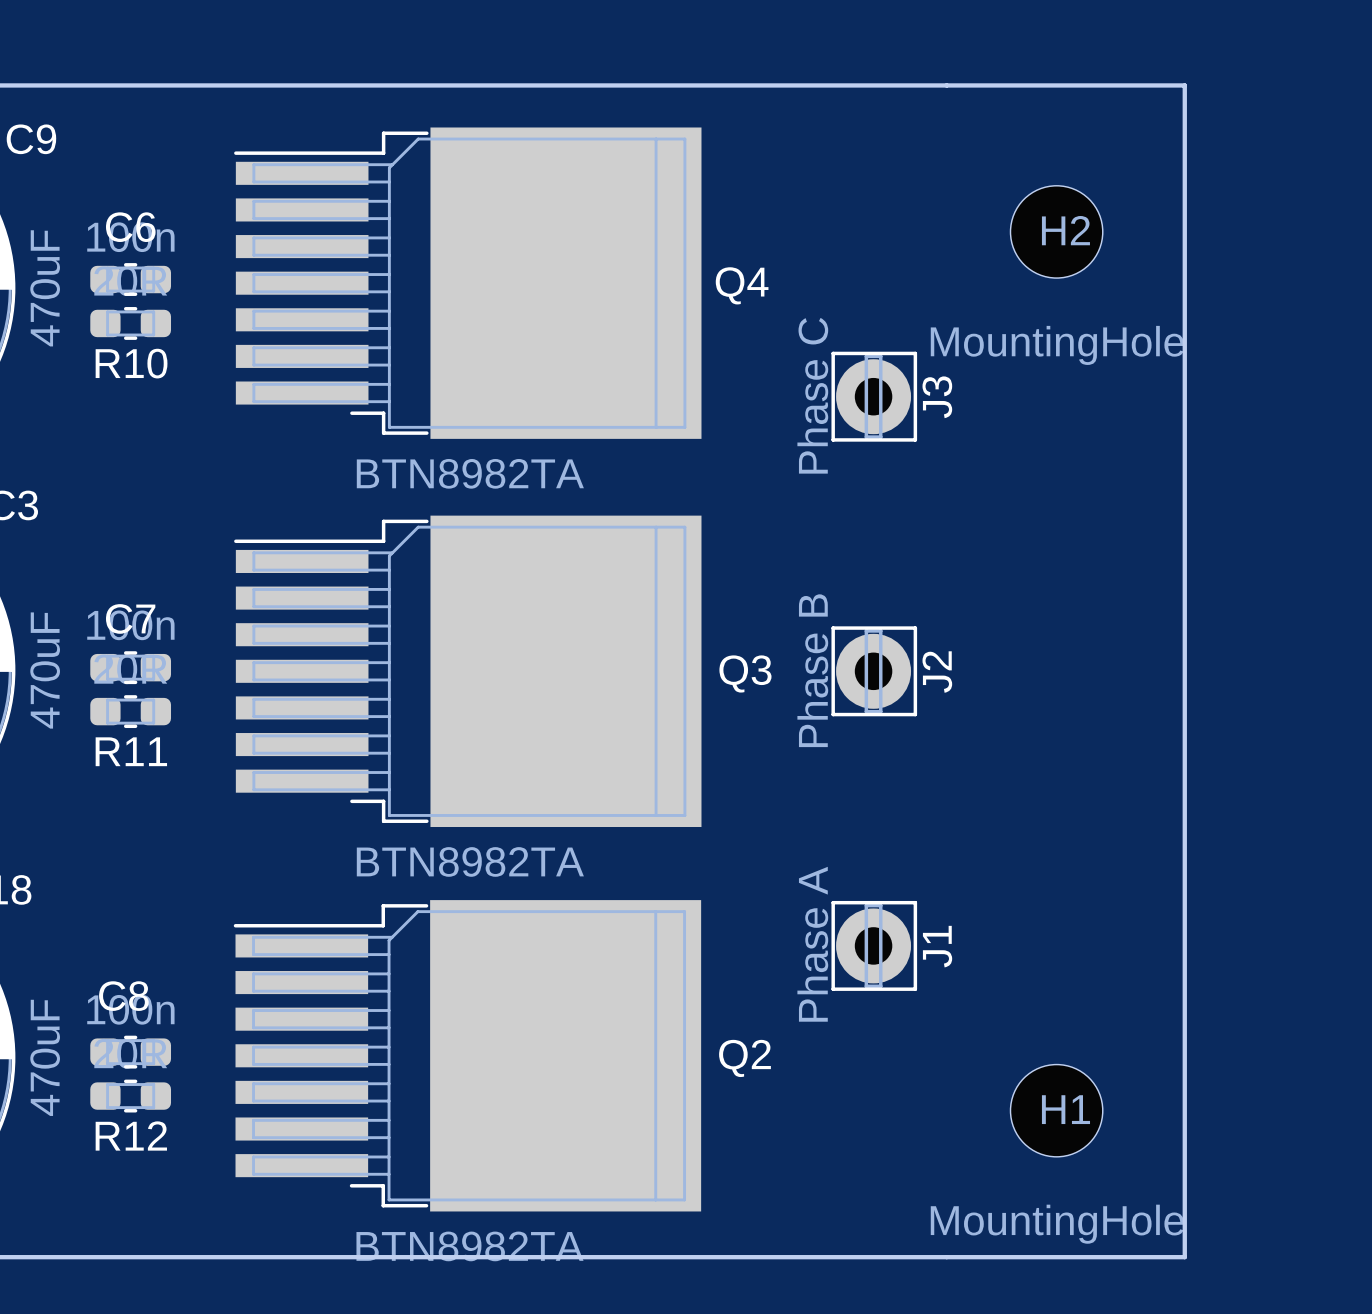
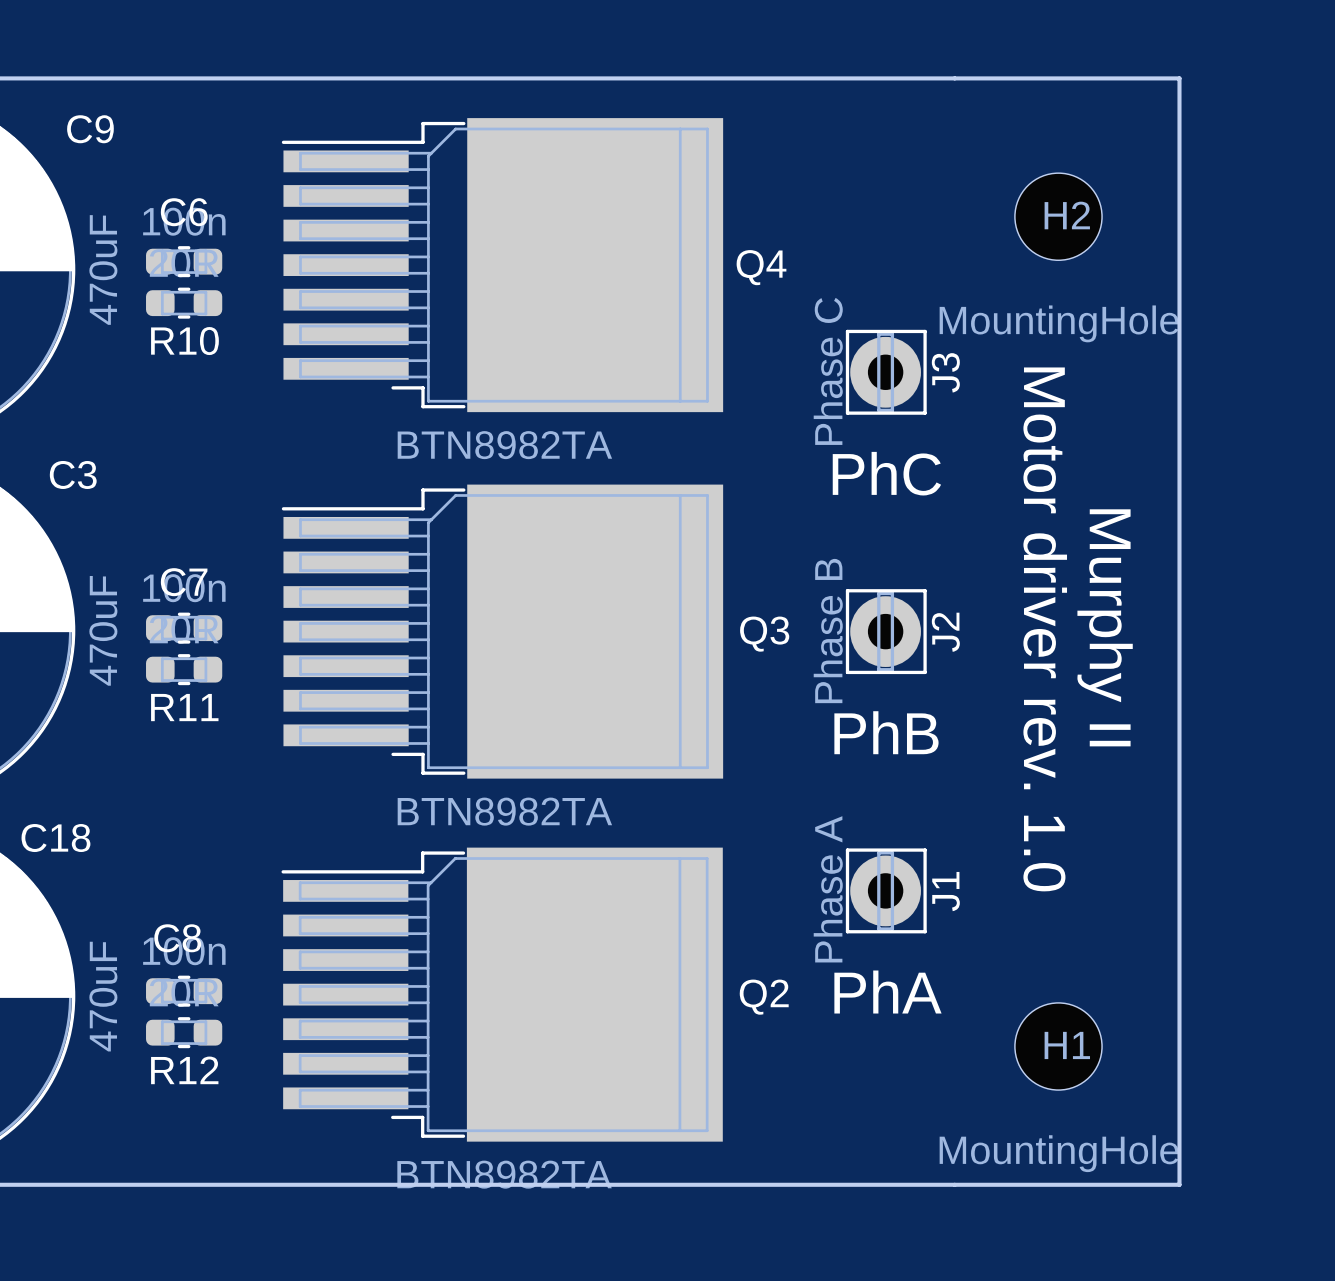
text: none -> PhC (886, 473)
text: none -> Murphy II (1105, 627)
text: none -> Motor driver rev. 1.0 (1045, 629)
text: none -> PhB (886, 732)
text: none -> PhA (887, 992)

